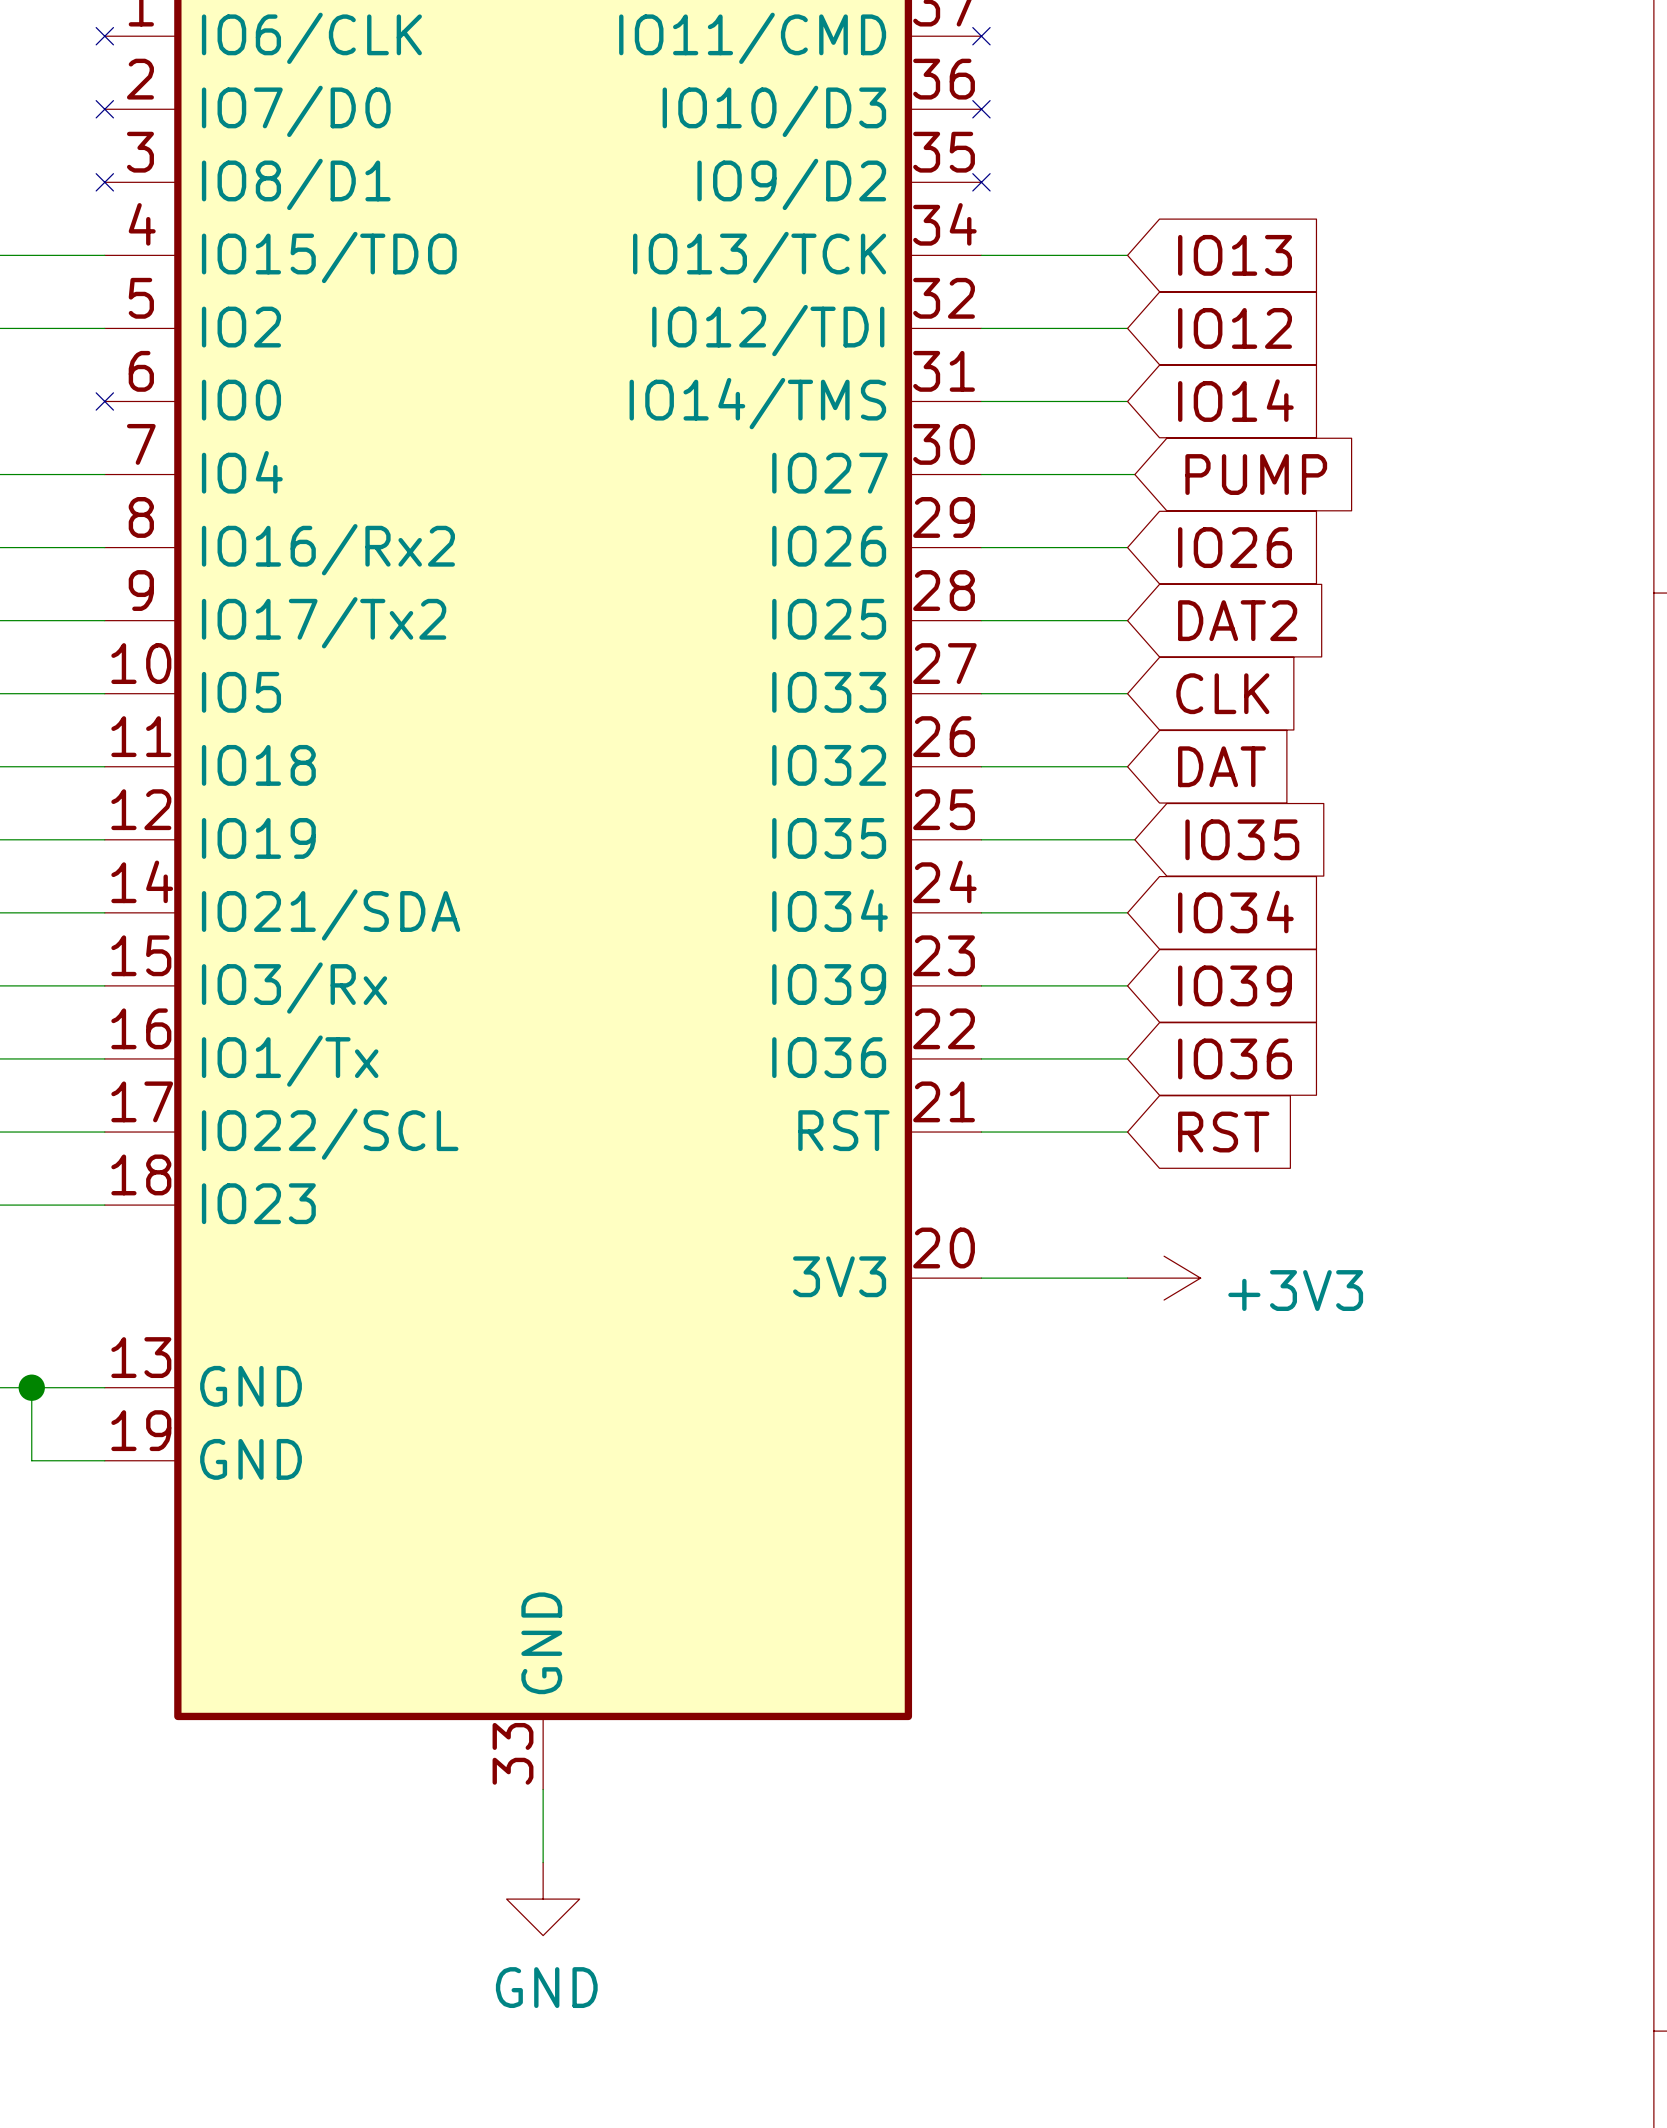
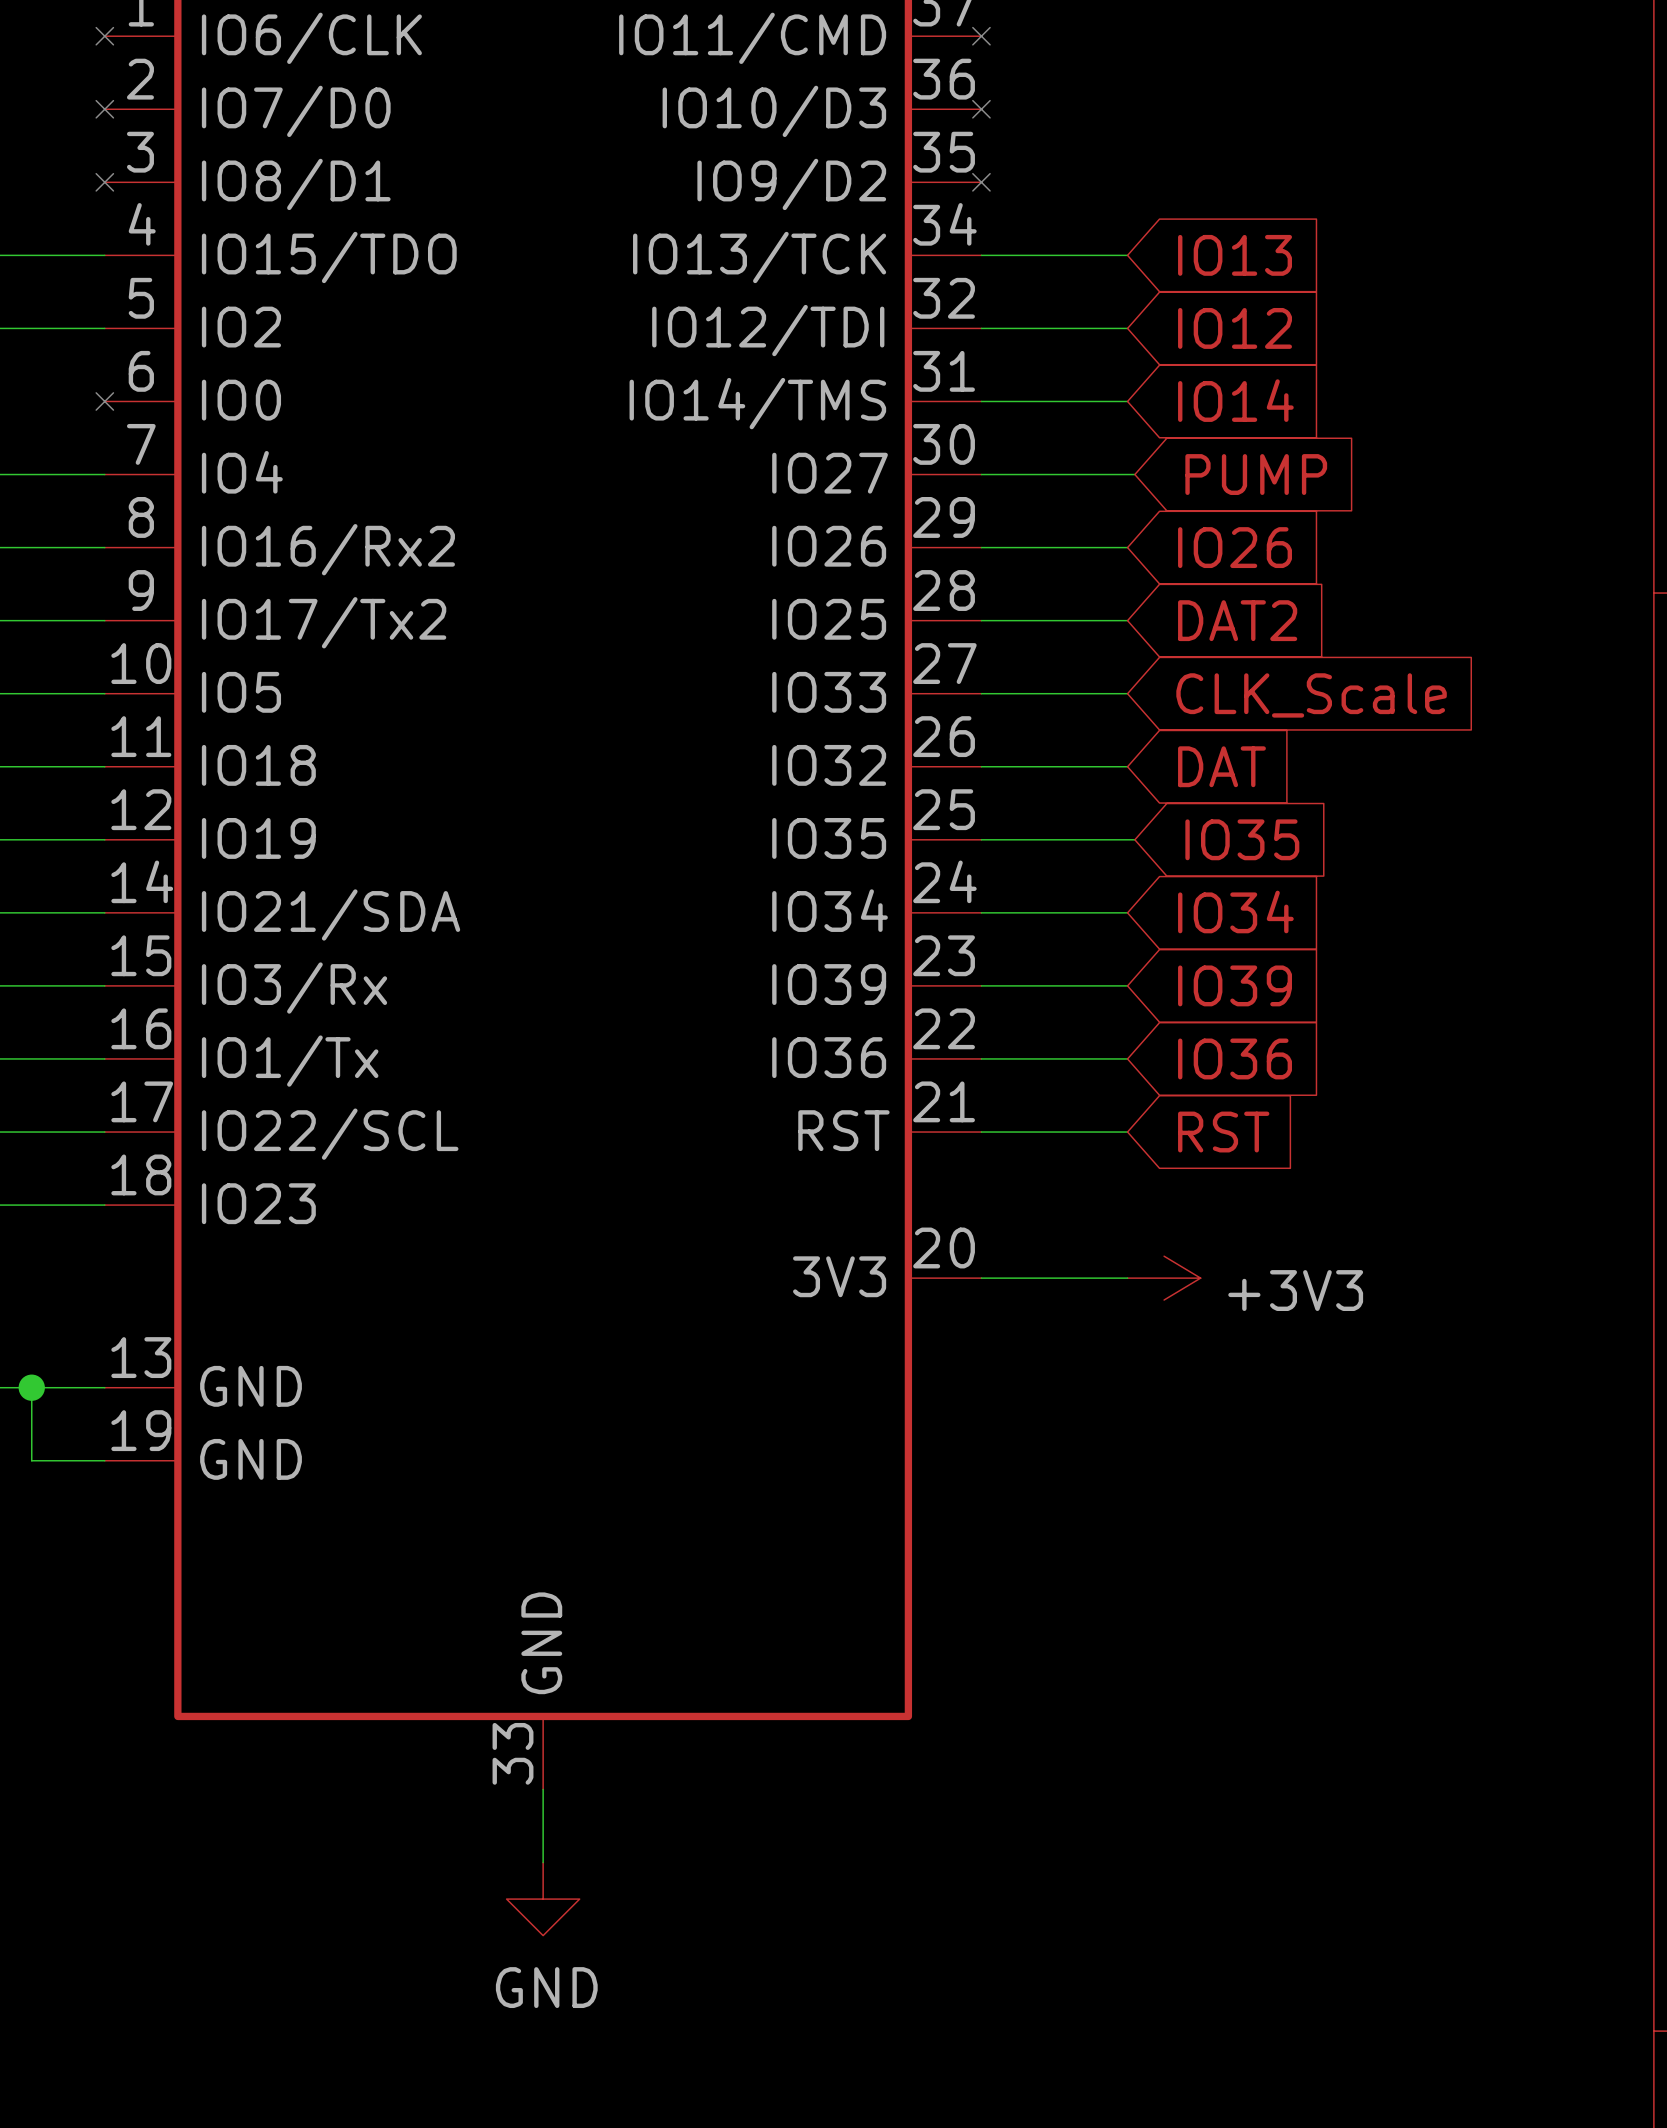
global label: CLK (1222, 693) -> CLK_Scale (1311, 695)

